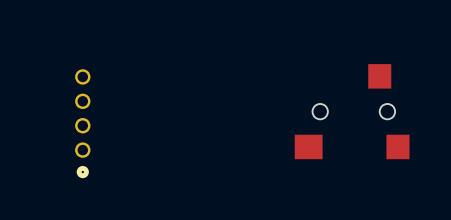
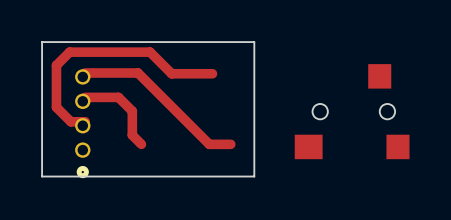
board edge: none -> (254, 42) (42, 42) (42, 176) (254, 176) (254, 42)
top track: none -> (85, 72) (137, 72) (209, 144) (230, 144)
top track: none -> (212, 73) (171, 73) (150, 52) (69, 52) (56, 65) (56, 107) (70, 121) (85, 121)
top track: none -> (85, 97) (118, 97) (132, 111) (132, 135) (141, 144)

